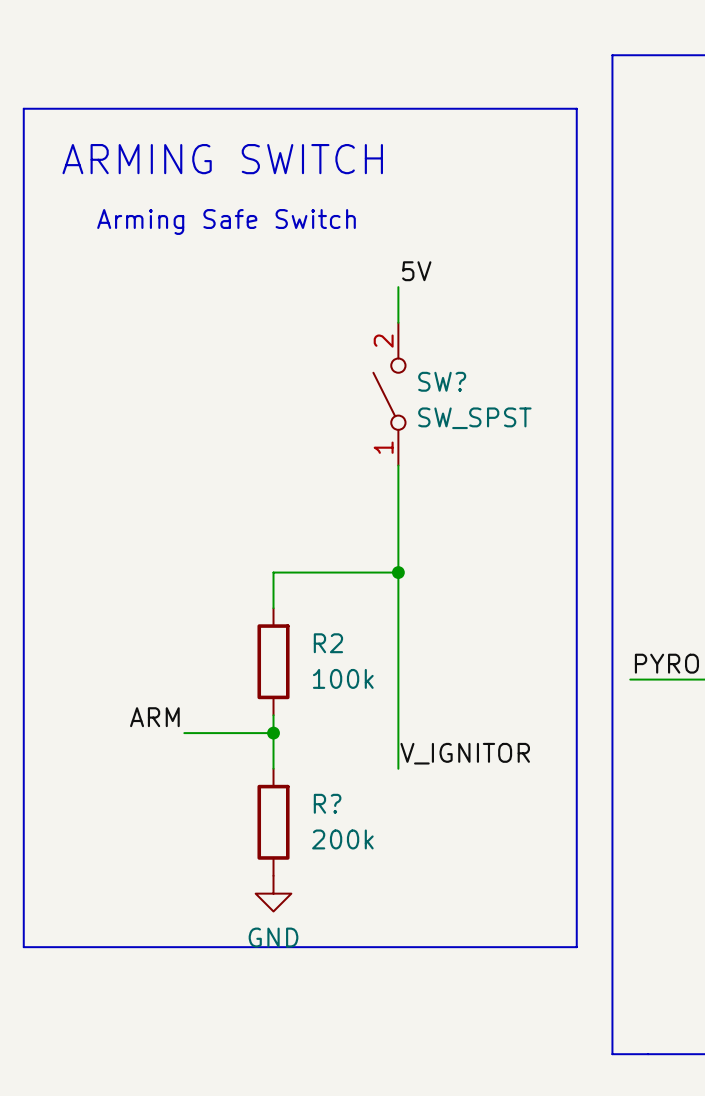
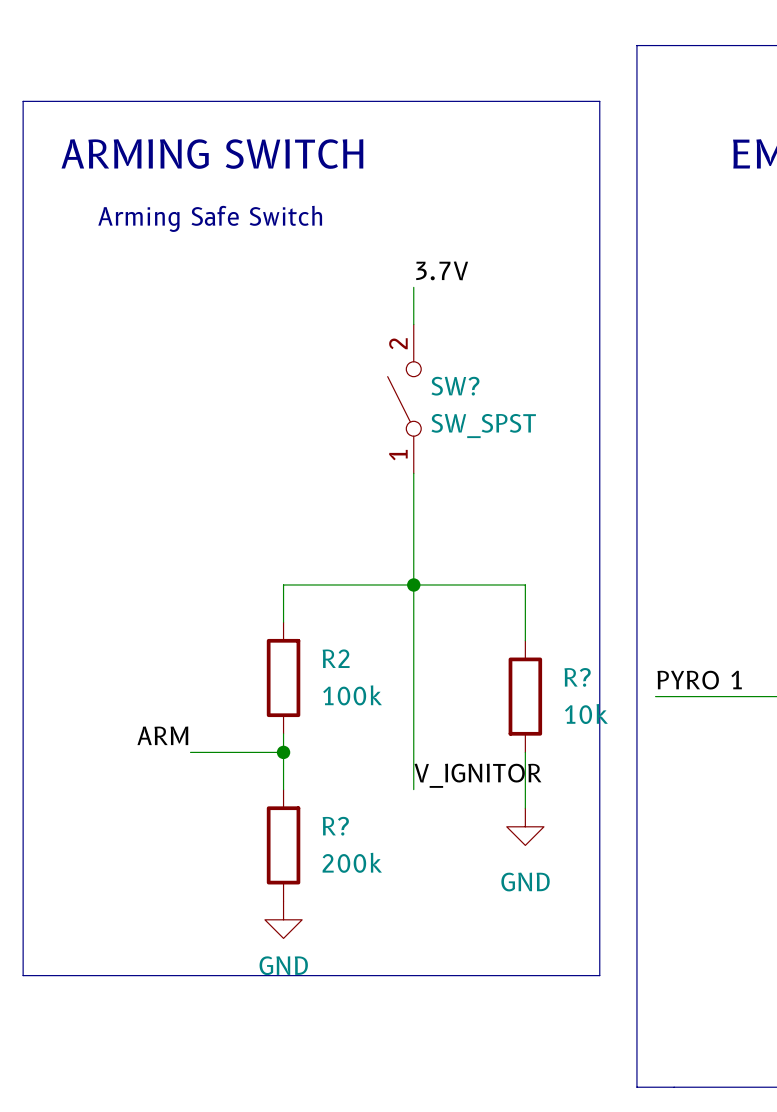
label: 5V (416, 271) -> 3.7V (442, 270)
wire: none -> (413, 584) (525, 584) (525, 640)
R?: none -> 10k (525, 696)
wire: none -> (525, 752) (525, 808)
power symbol: none -> GND (525, 826)

